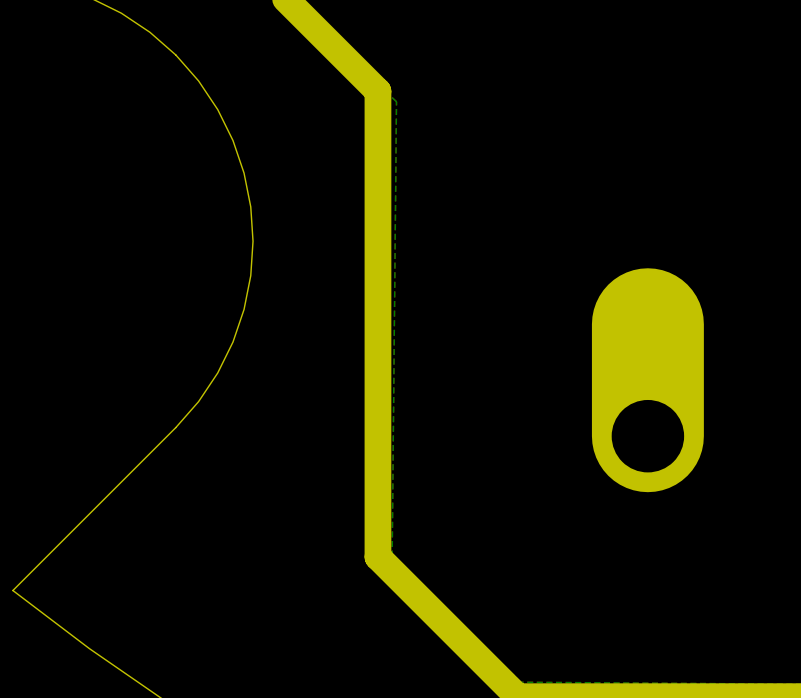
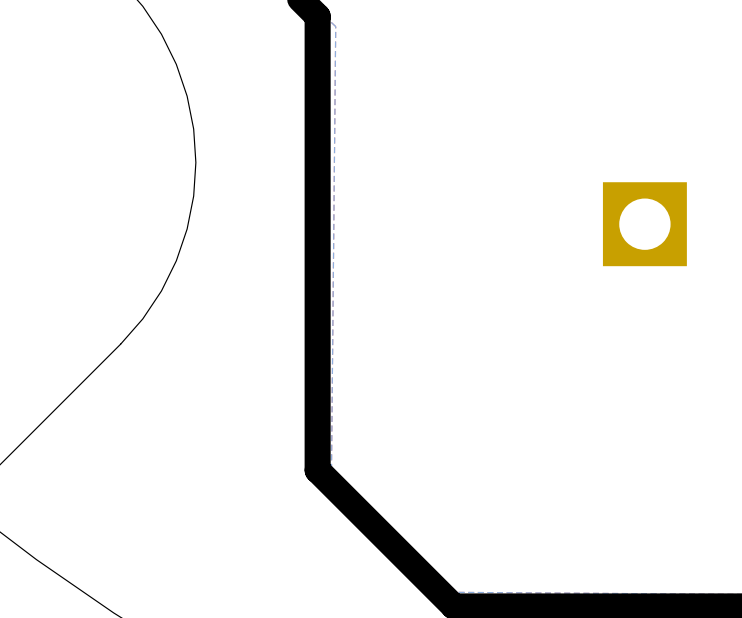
part: none -> (644, 224)
part: (647, 380) -> none

